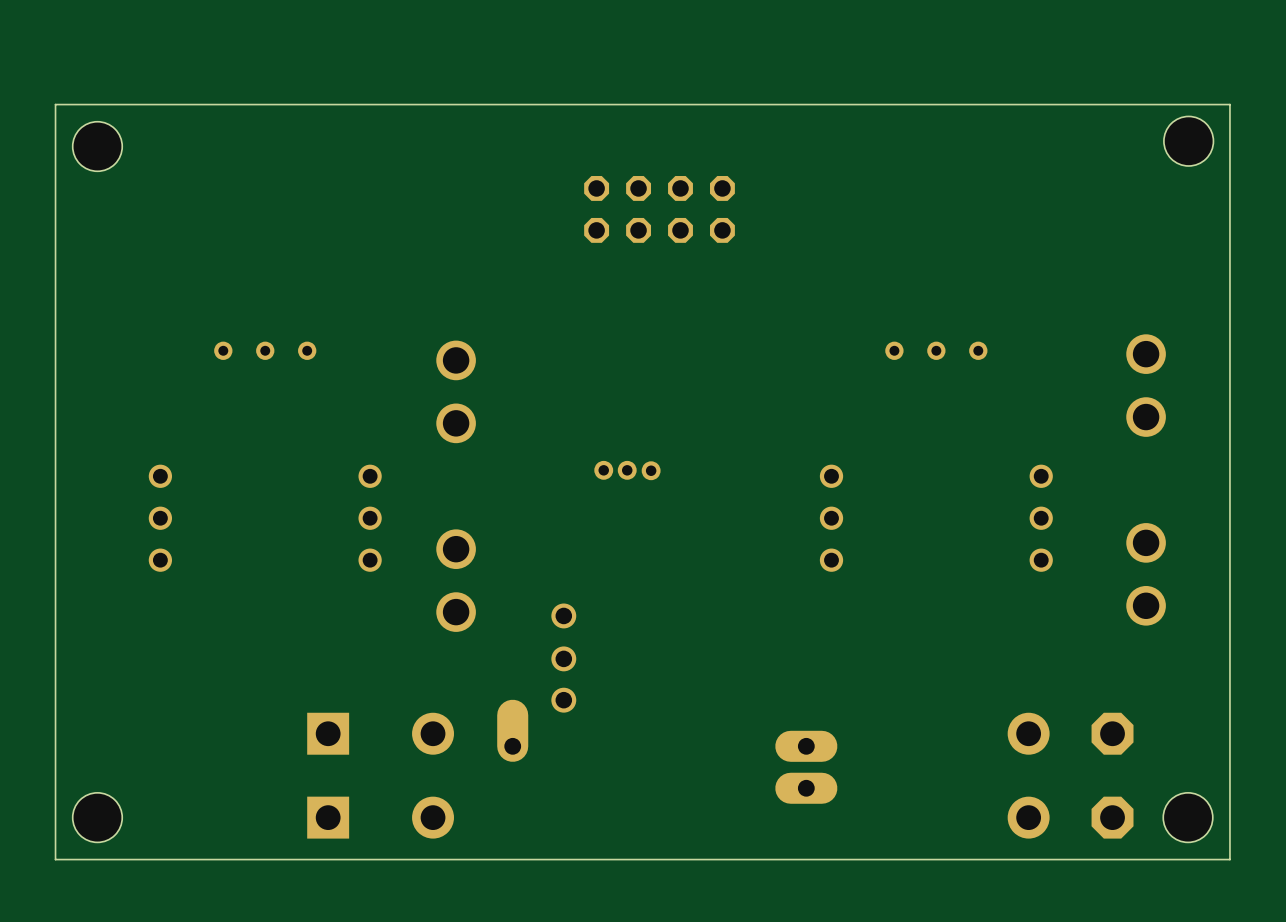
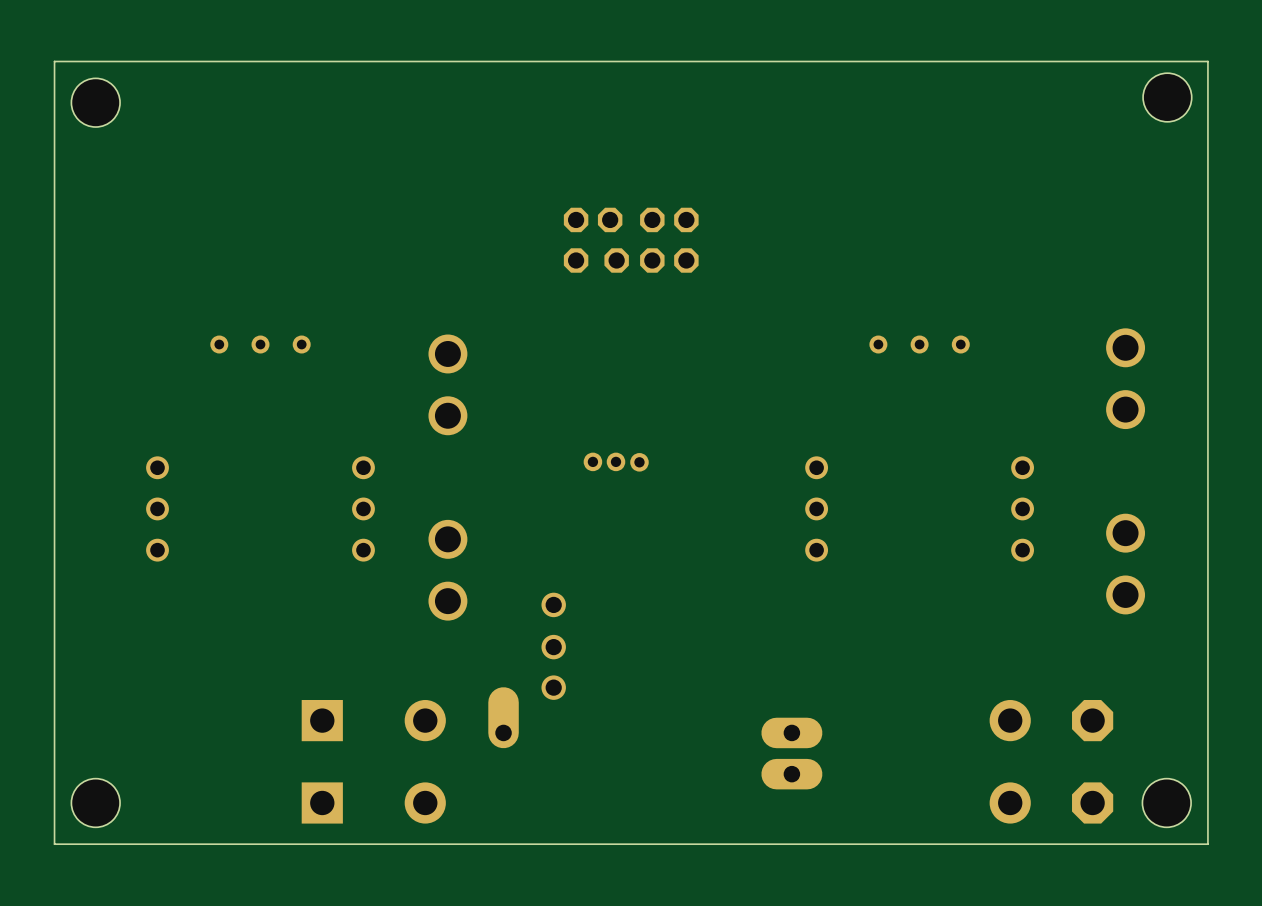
board edge: (1229, 104) (55, 104) -> (1207, 102) (1207, 61) (54, 61) (54, 102)
hole position: (1188, 141) -> (1167, 97)
hole position: (97, 146) -> (95, 102)
part: (659, 209) -> none
part: none -> (631, 240)

